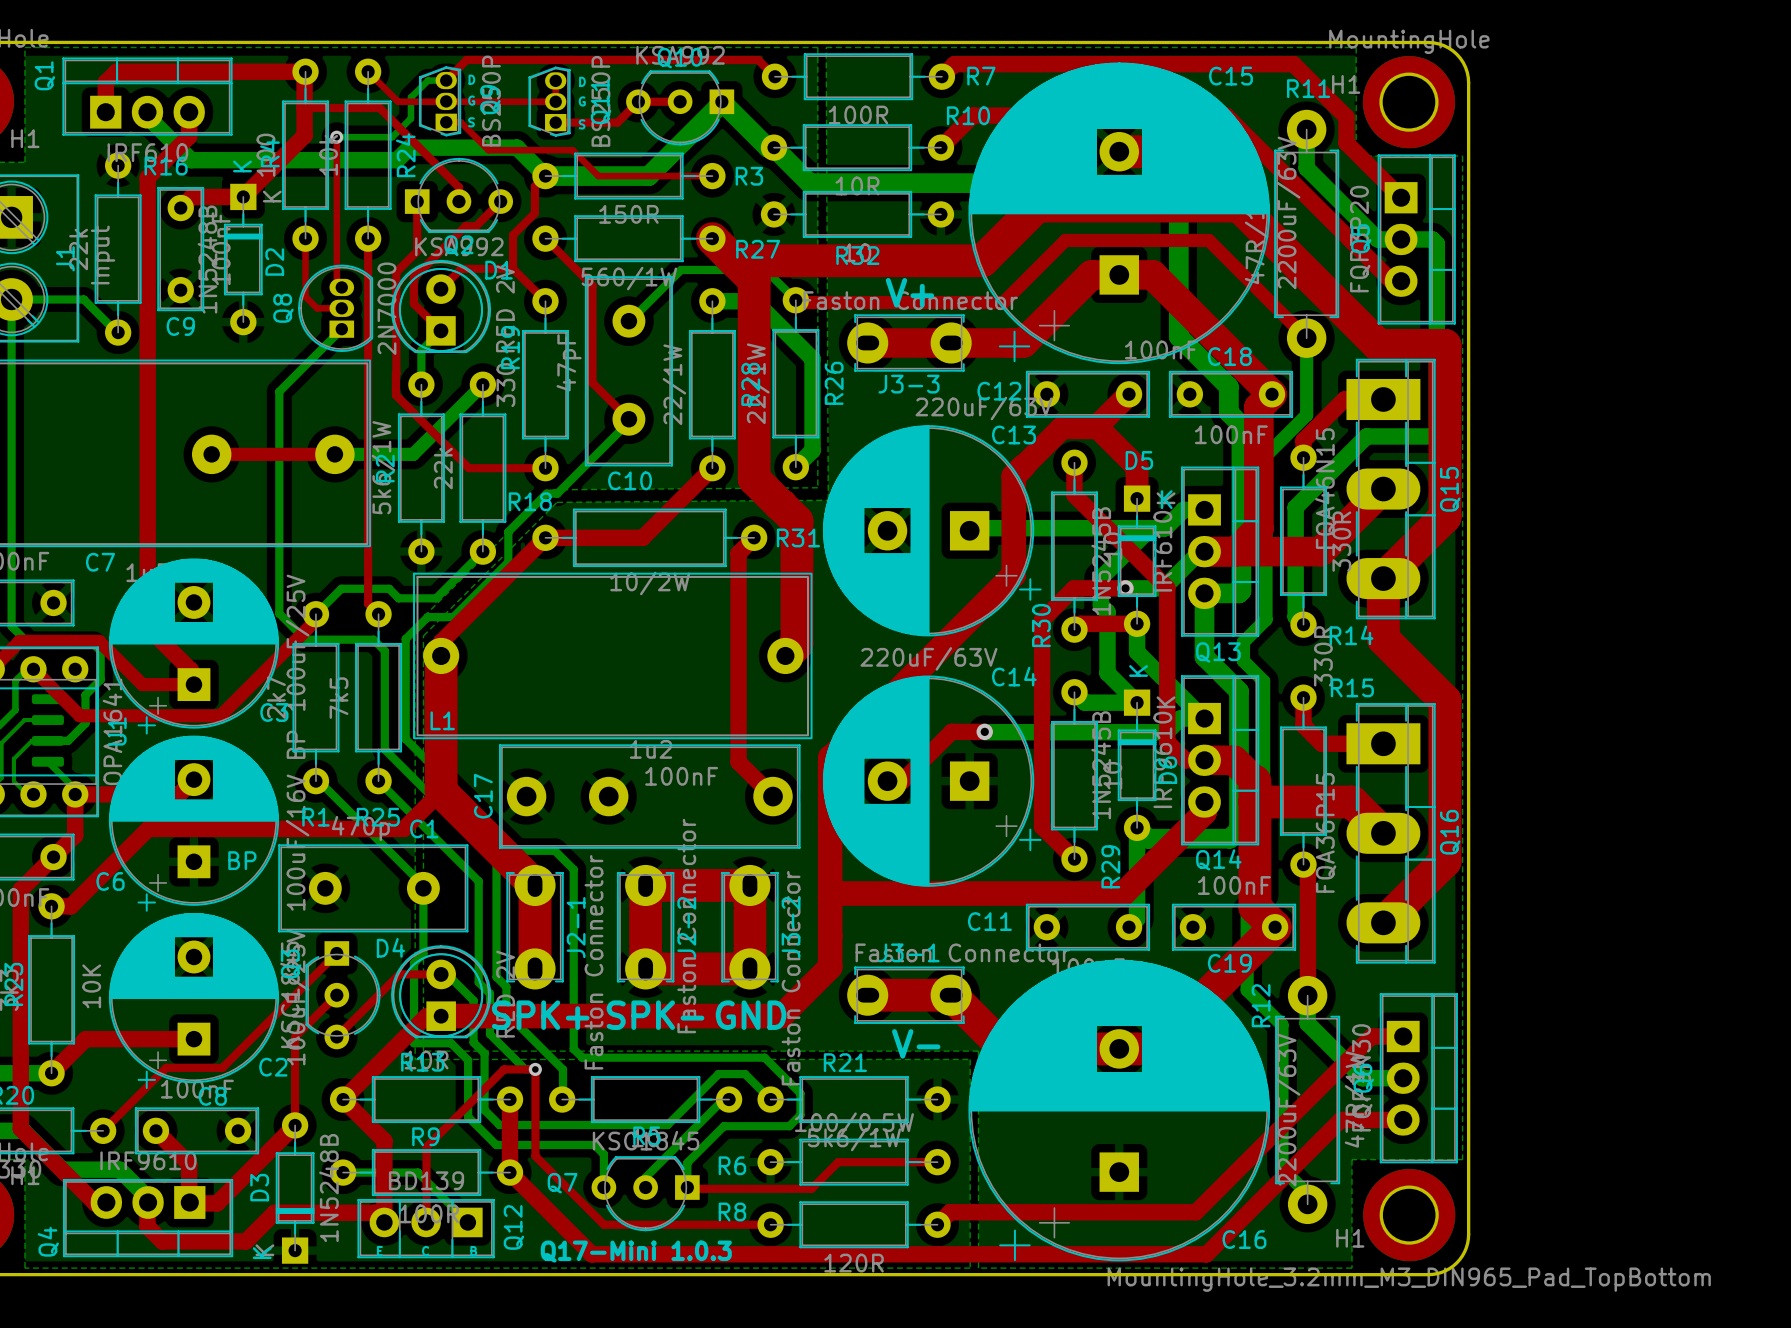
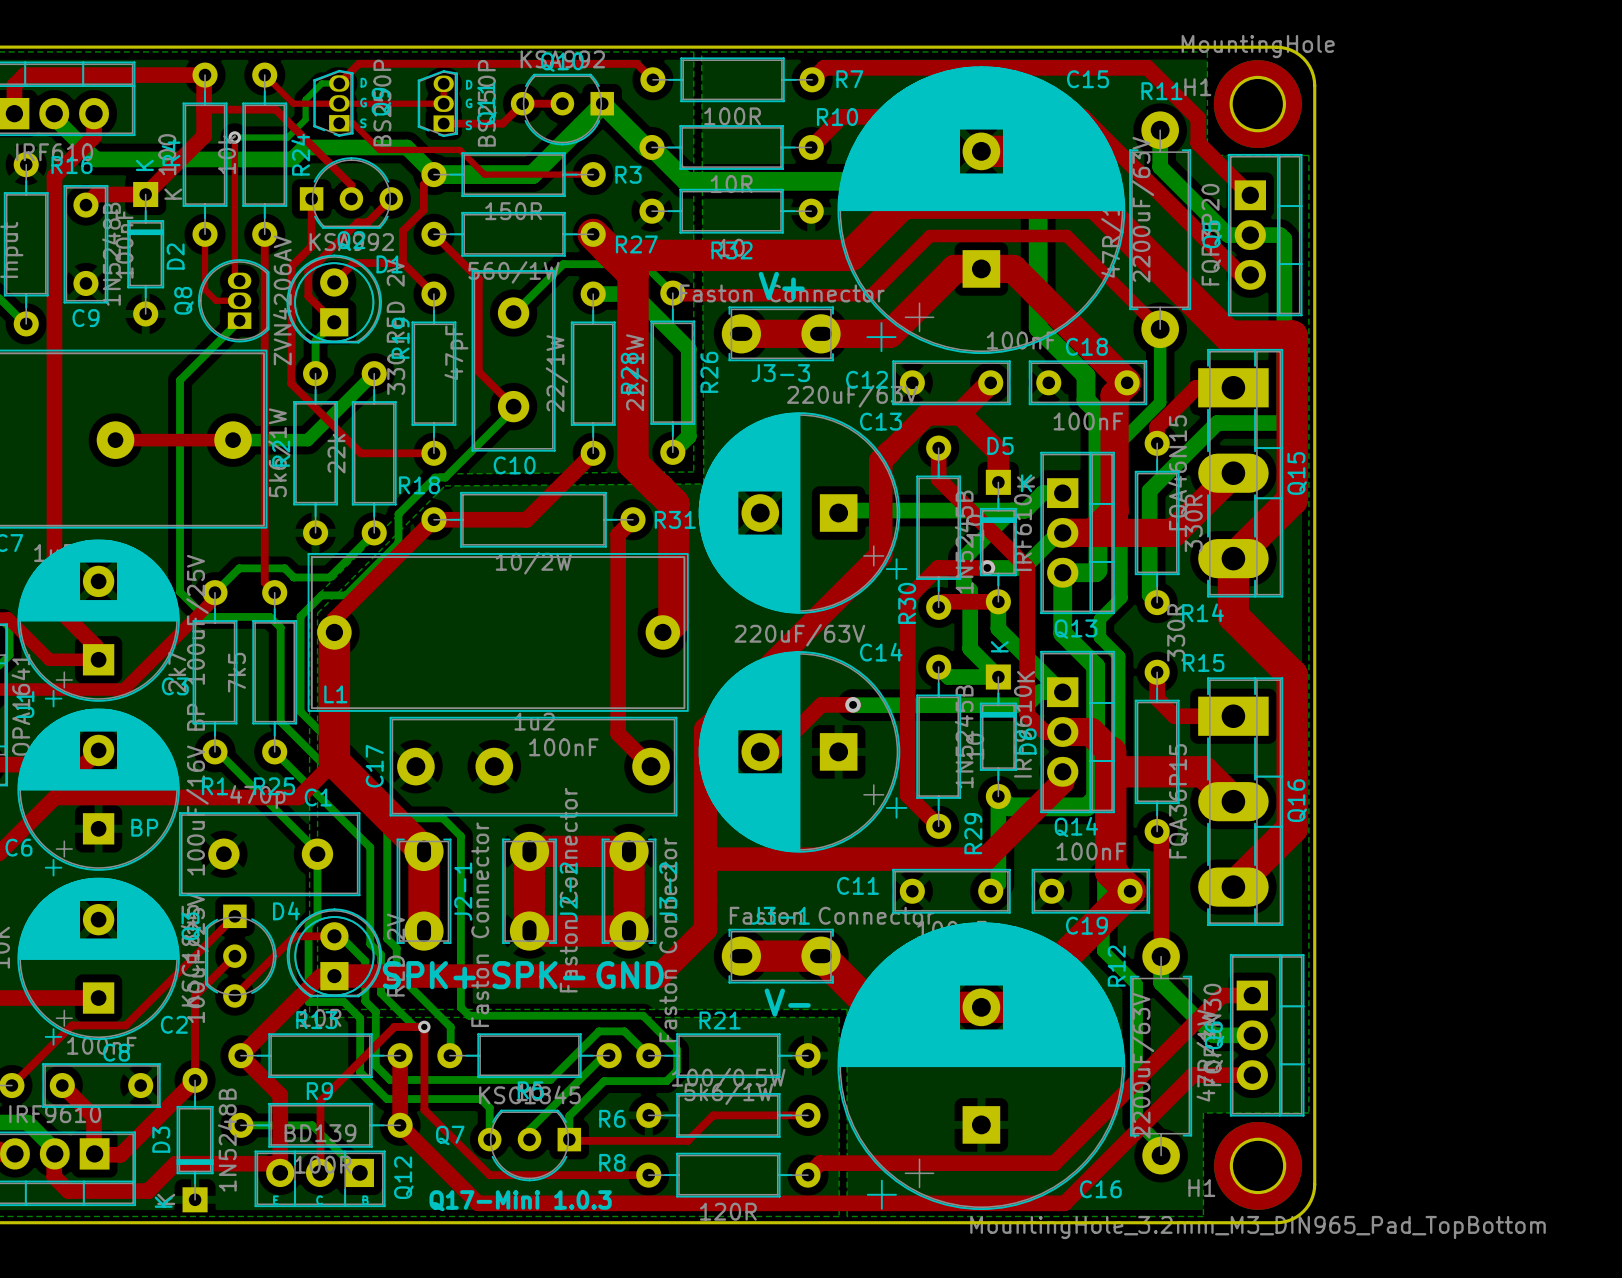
Q8 value: 2N7000 (387, 308) -> ZVN4206AV (282, 300)

